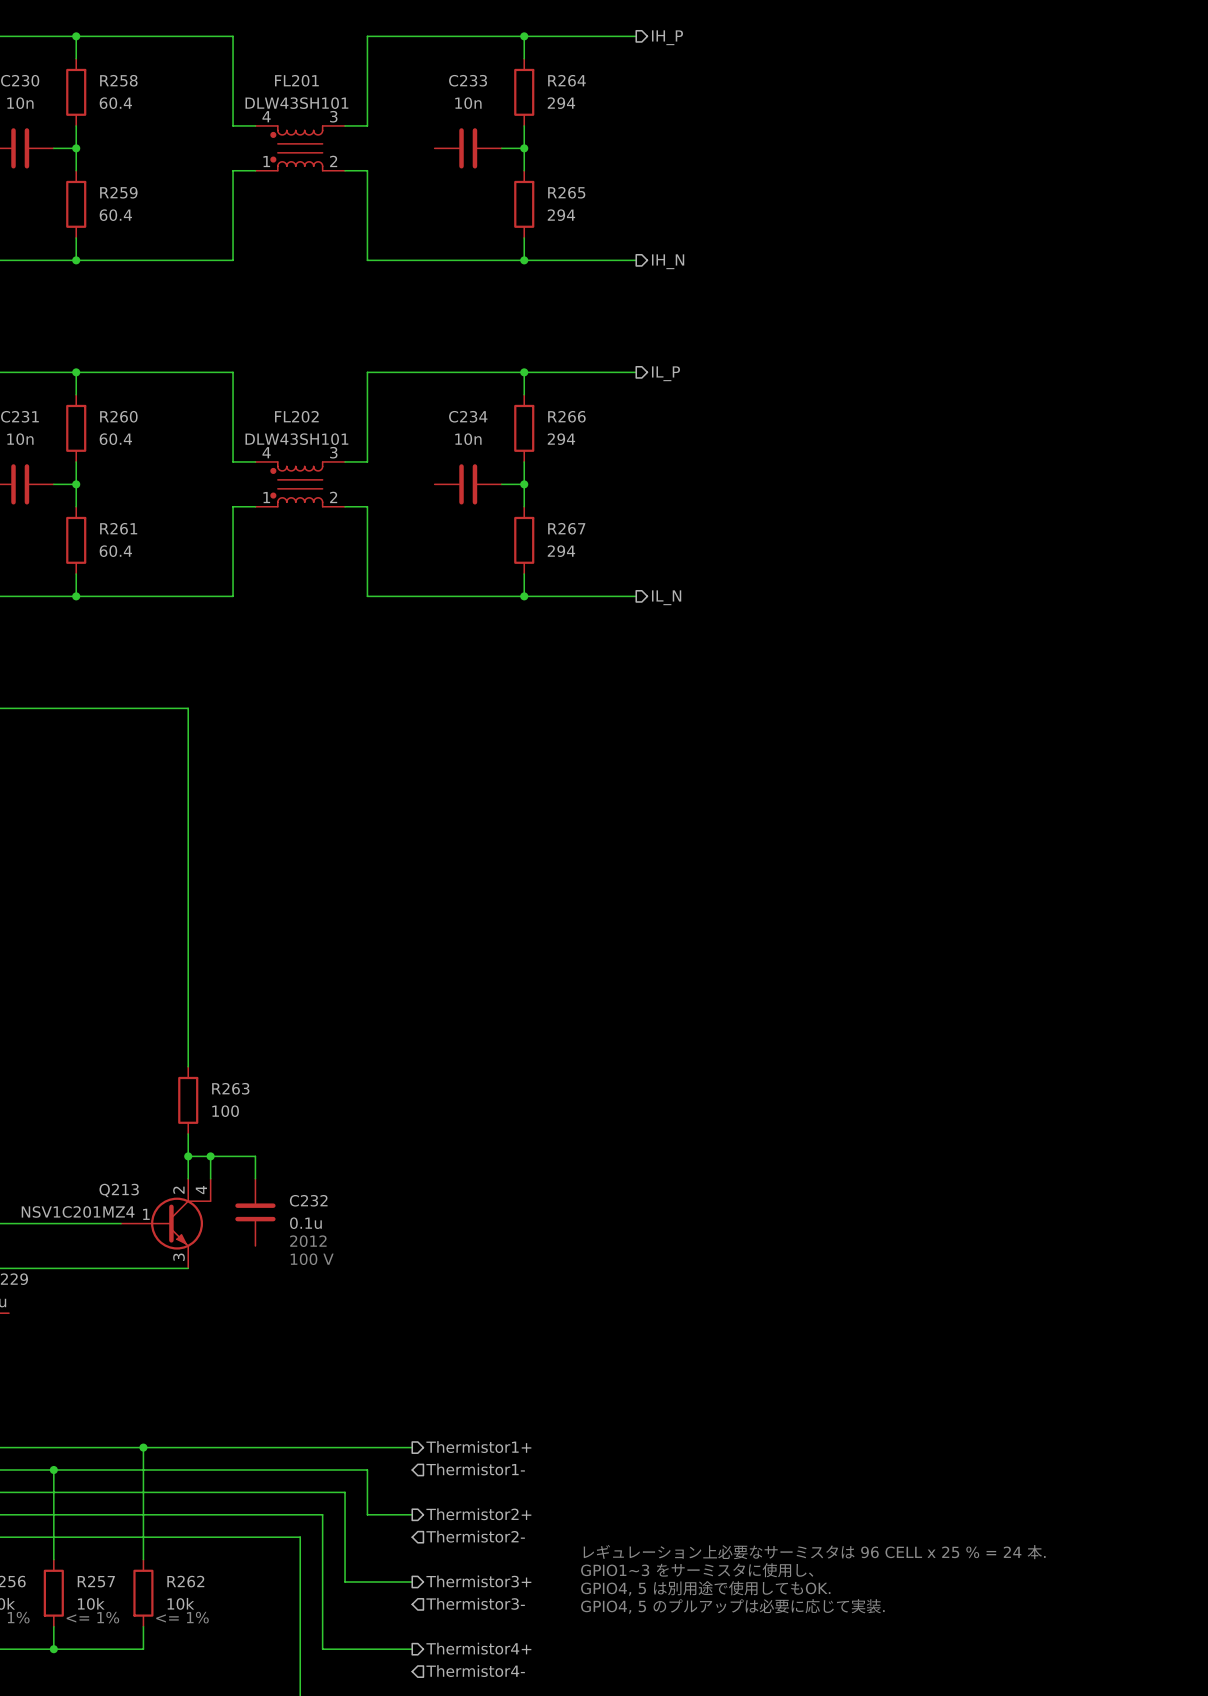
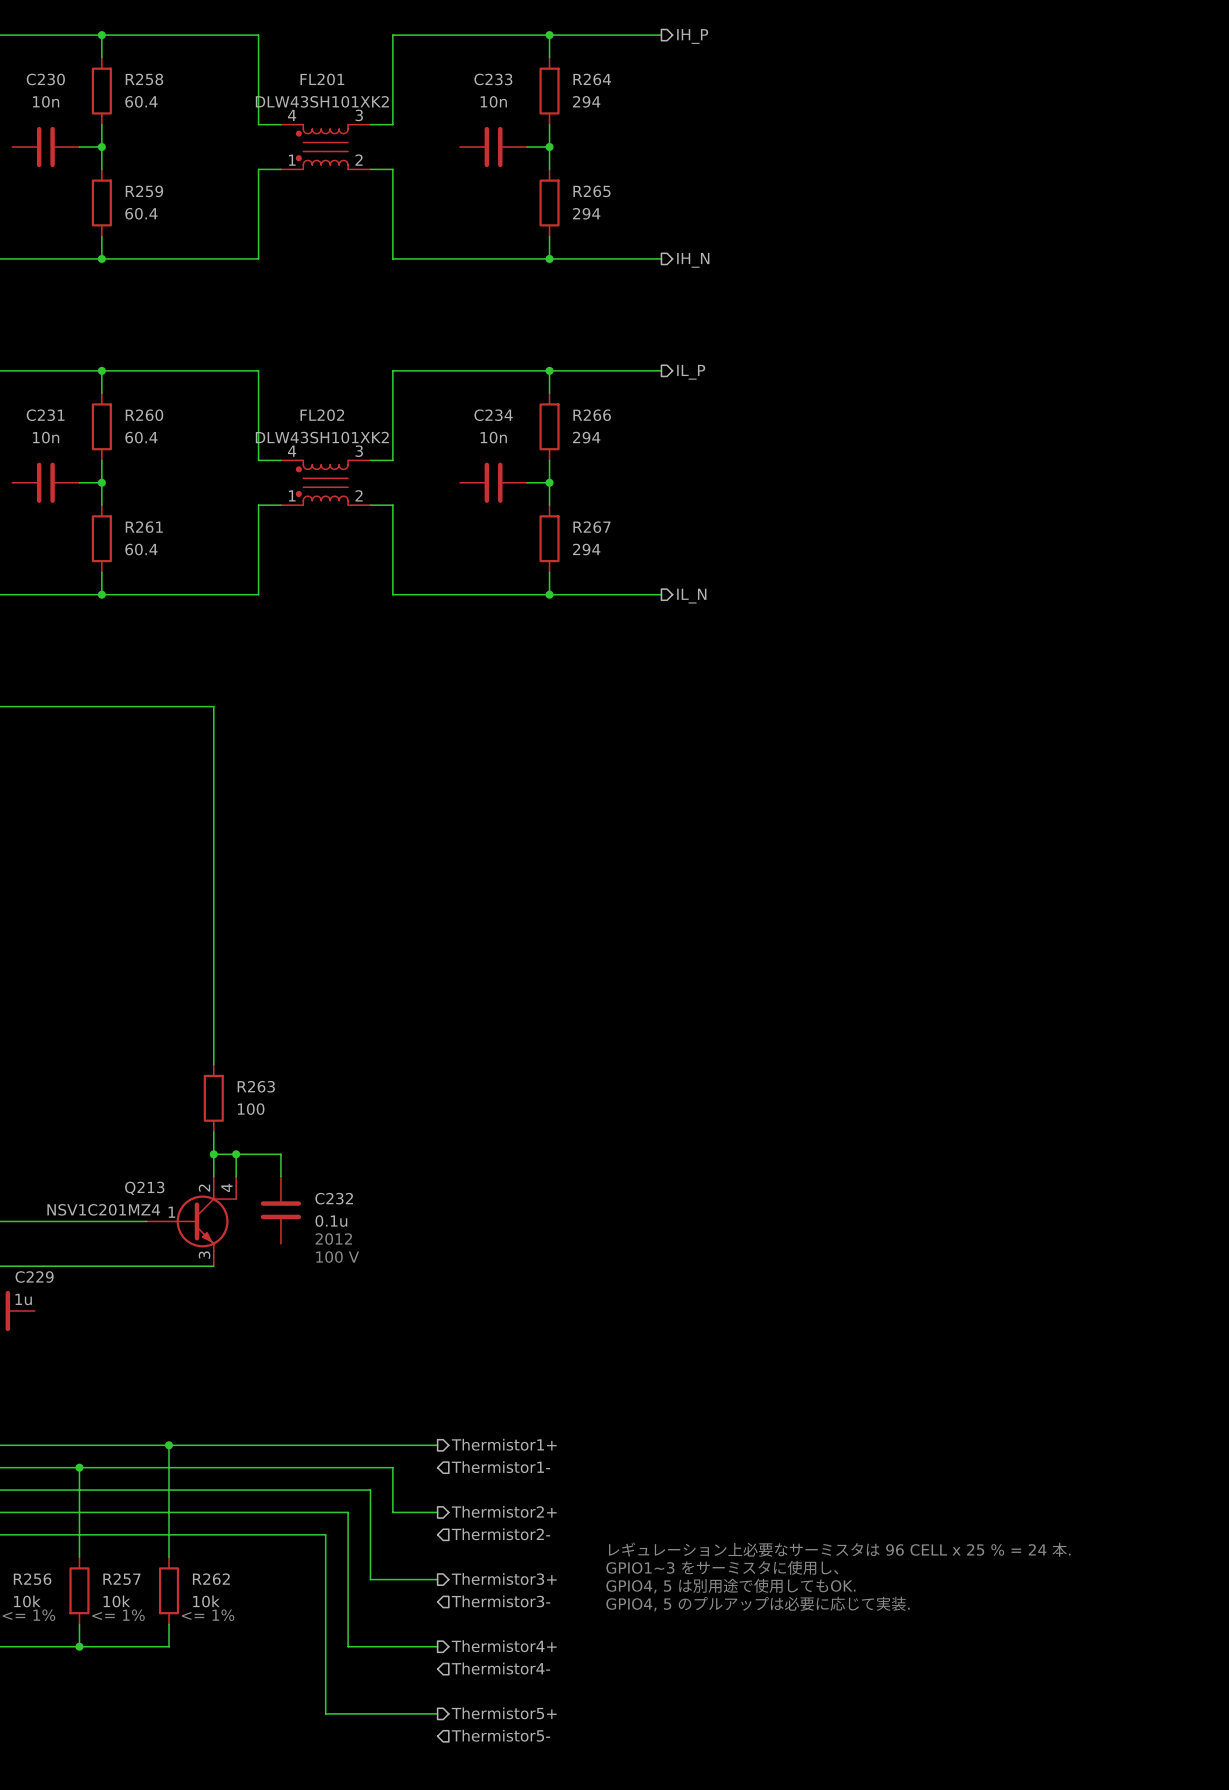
FL201 value: DLW43SH101 (296, 103) -> DLW43SH101XK2 (322, 101)
FL202 value: DLW43SH101 (296, 439) -> DLW43SH101XK2 (322, 437)

